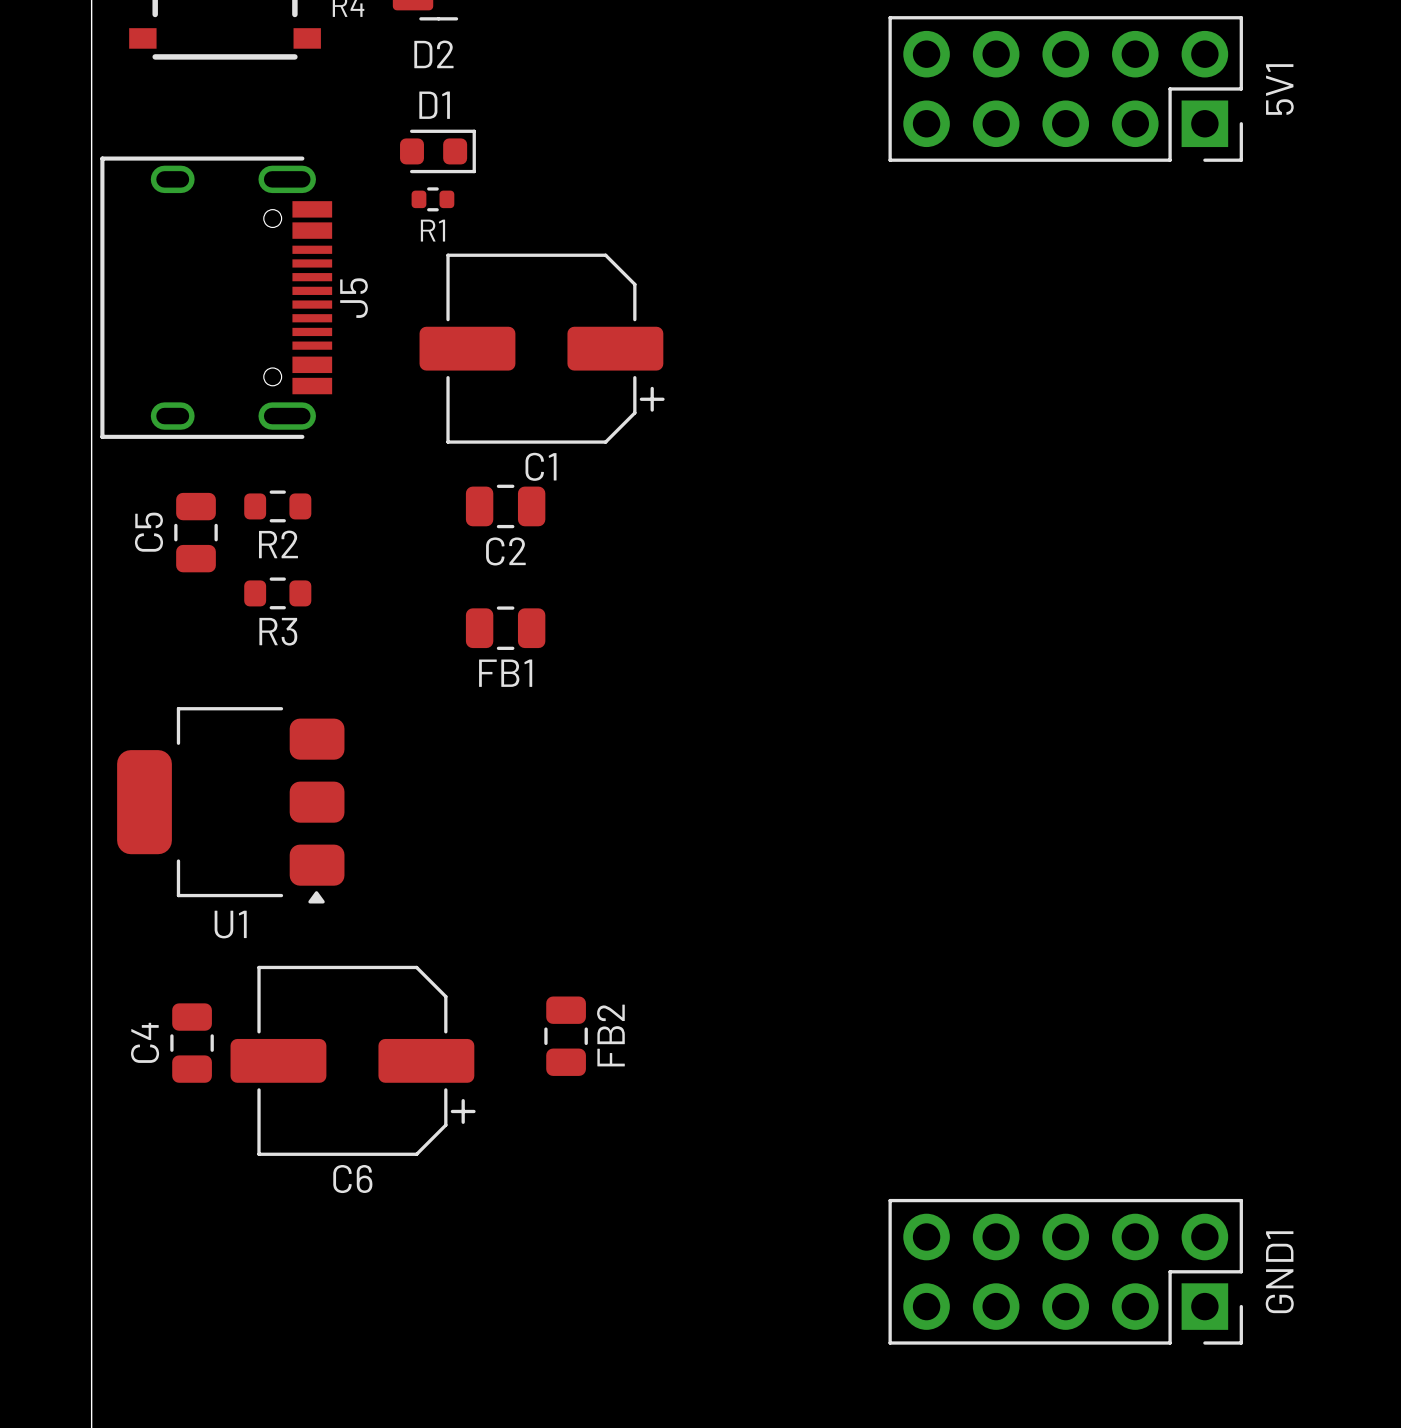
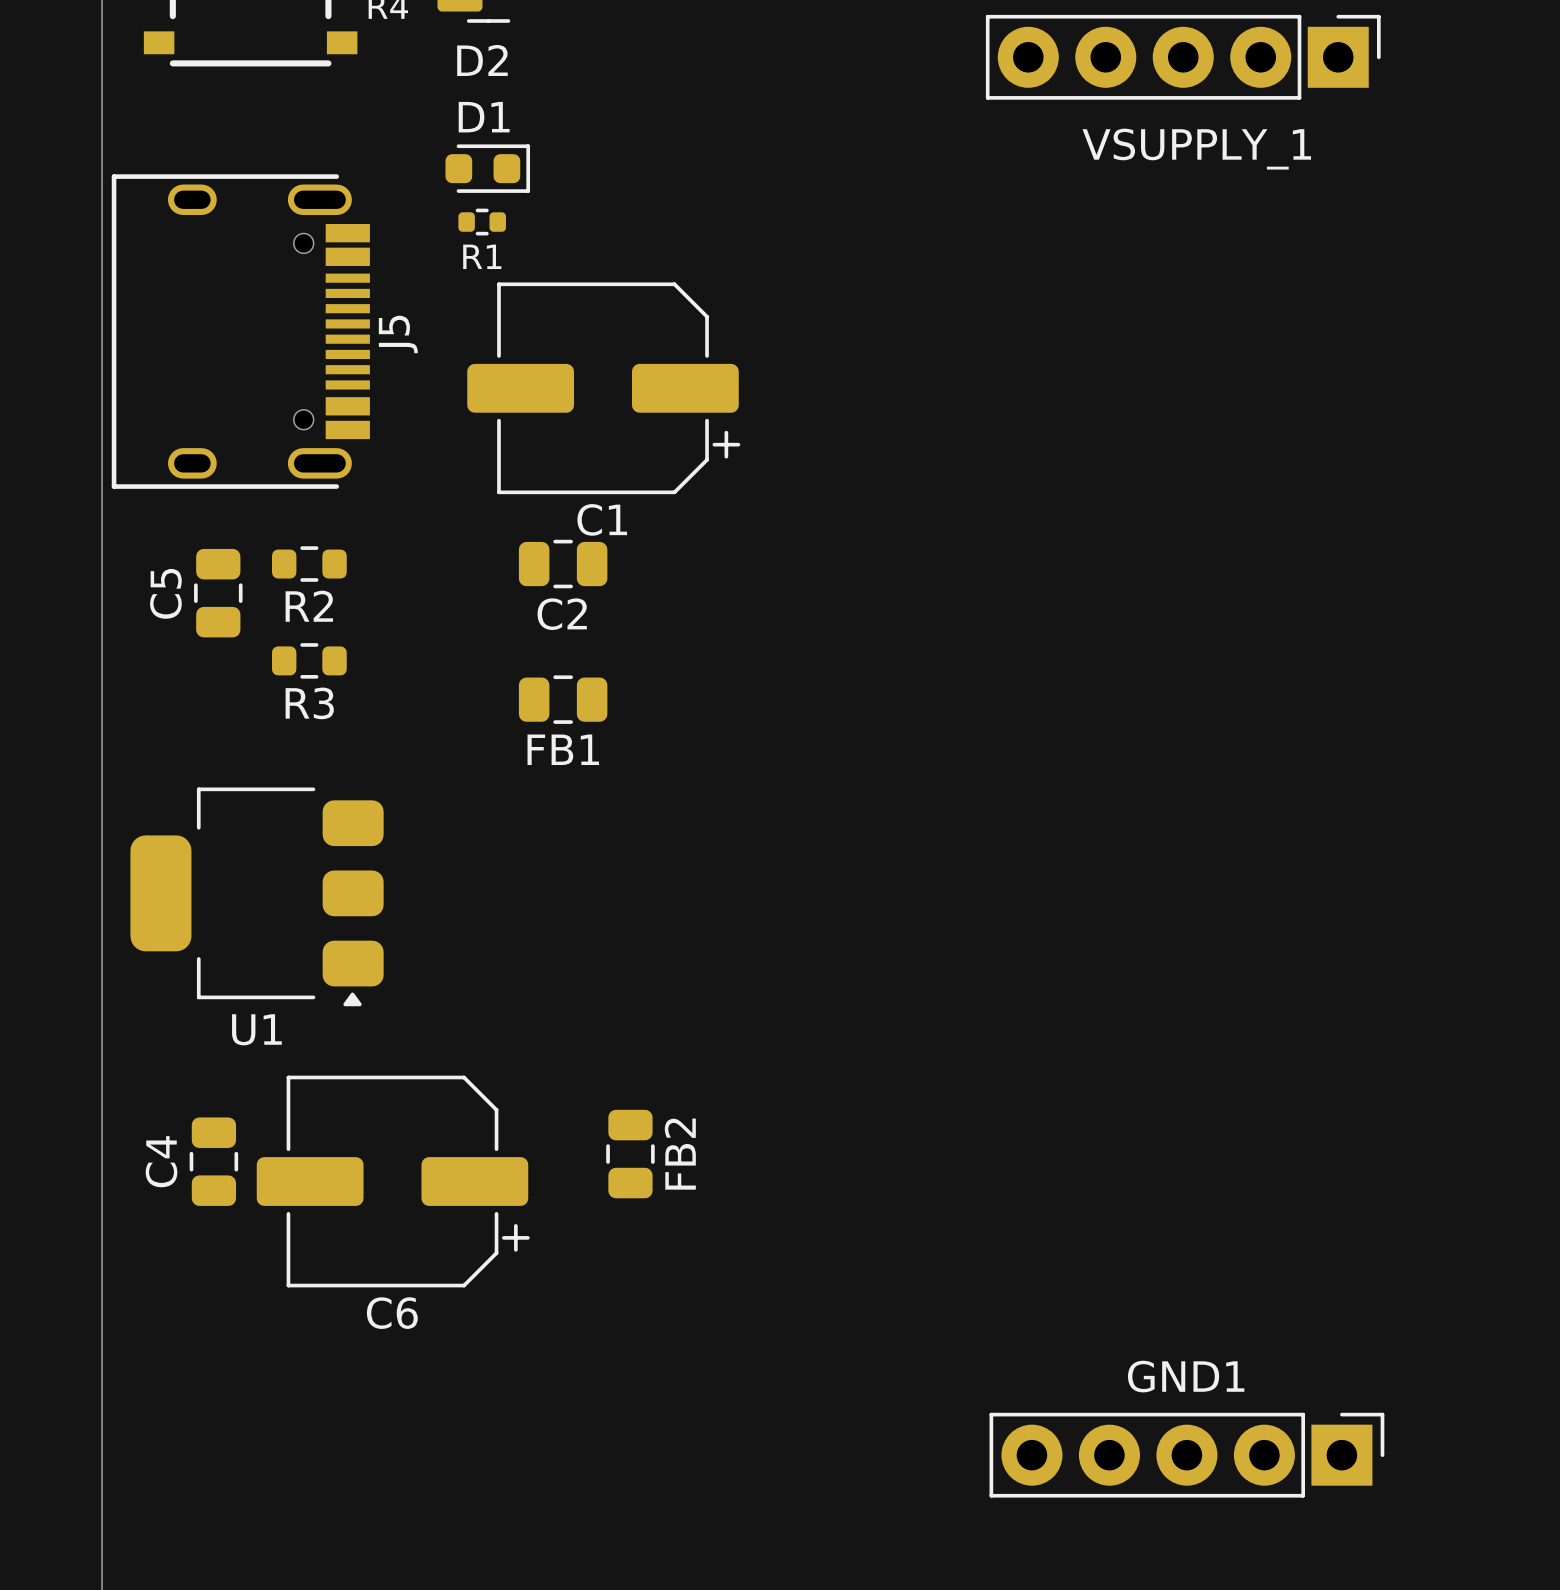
VSUPPLY_1: none -> (1183, 57)
5V1: (1065, 88) -> none
GND1 footprint: [888, 1198, 1243, 1345] -> [989, 1412, 1385, 1498]
GND1 name position: GND1 (1279, 1272) -> GND1 (1186, 1376)

